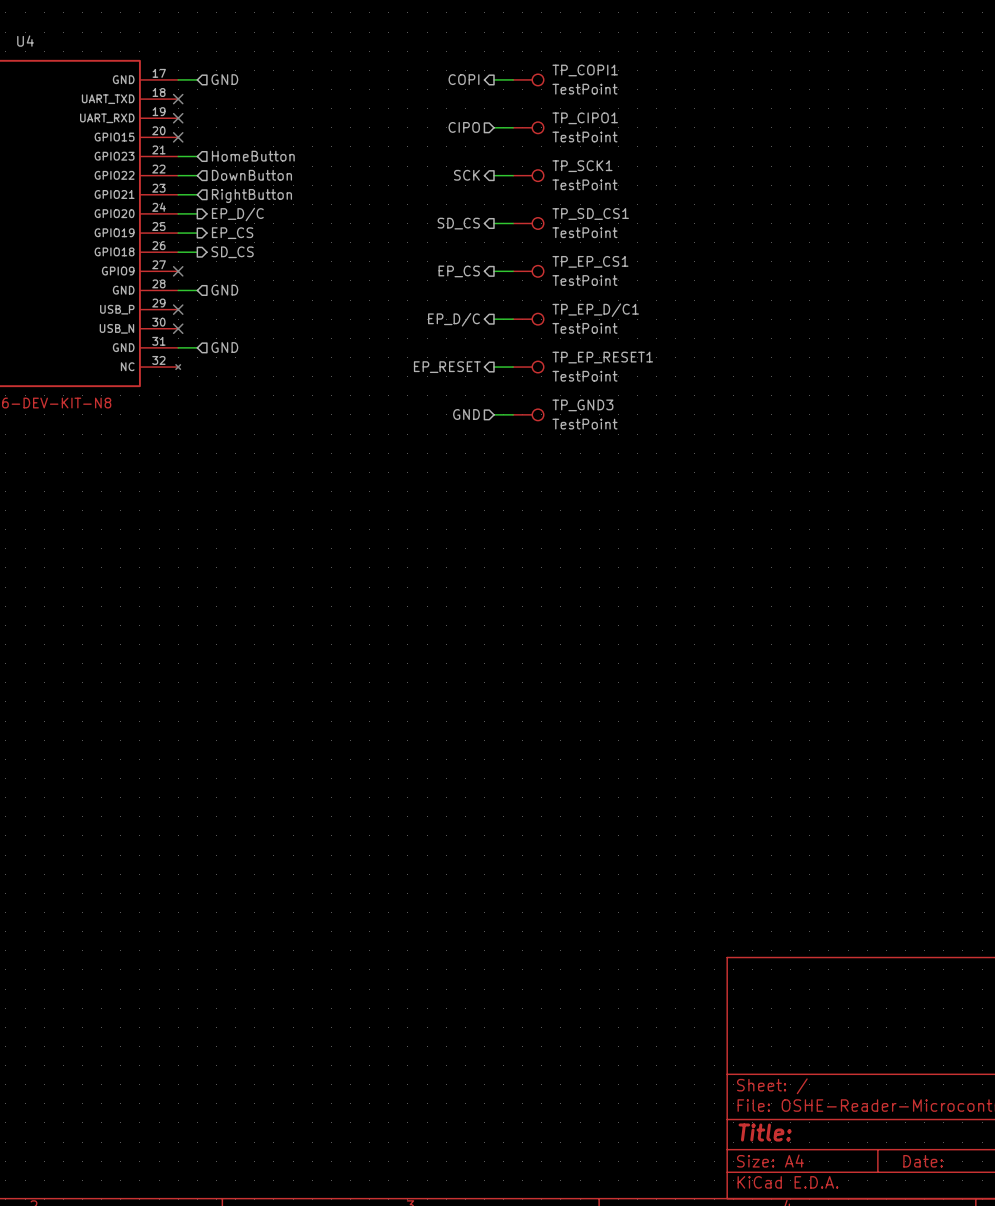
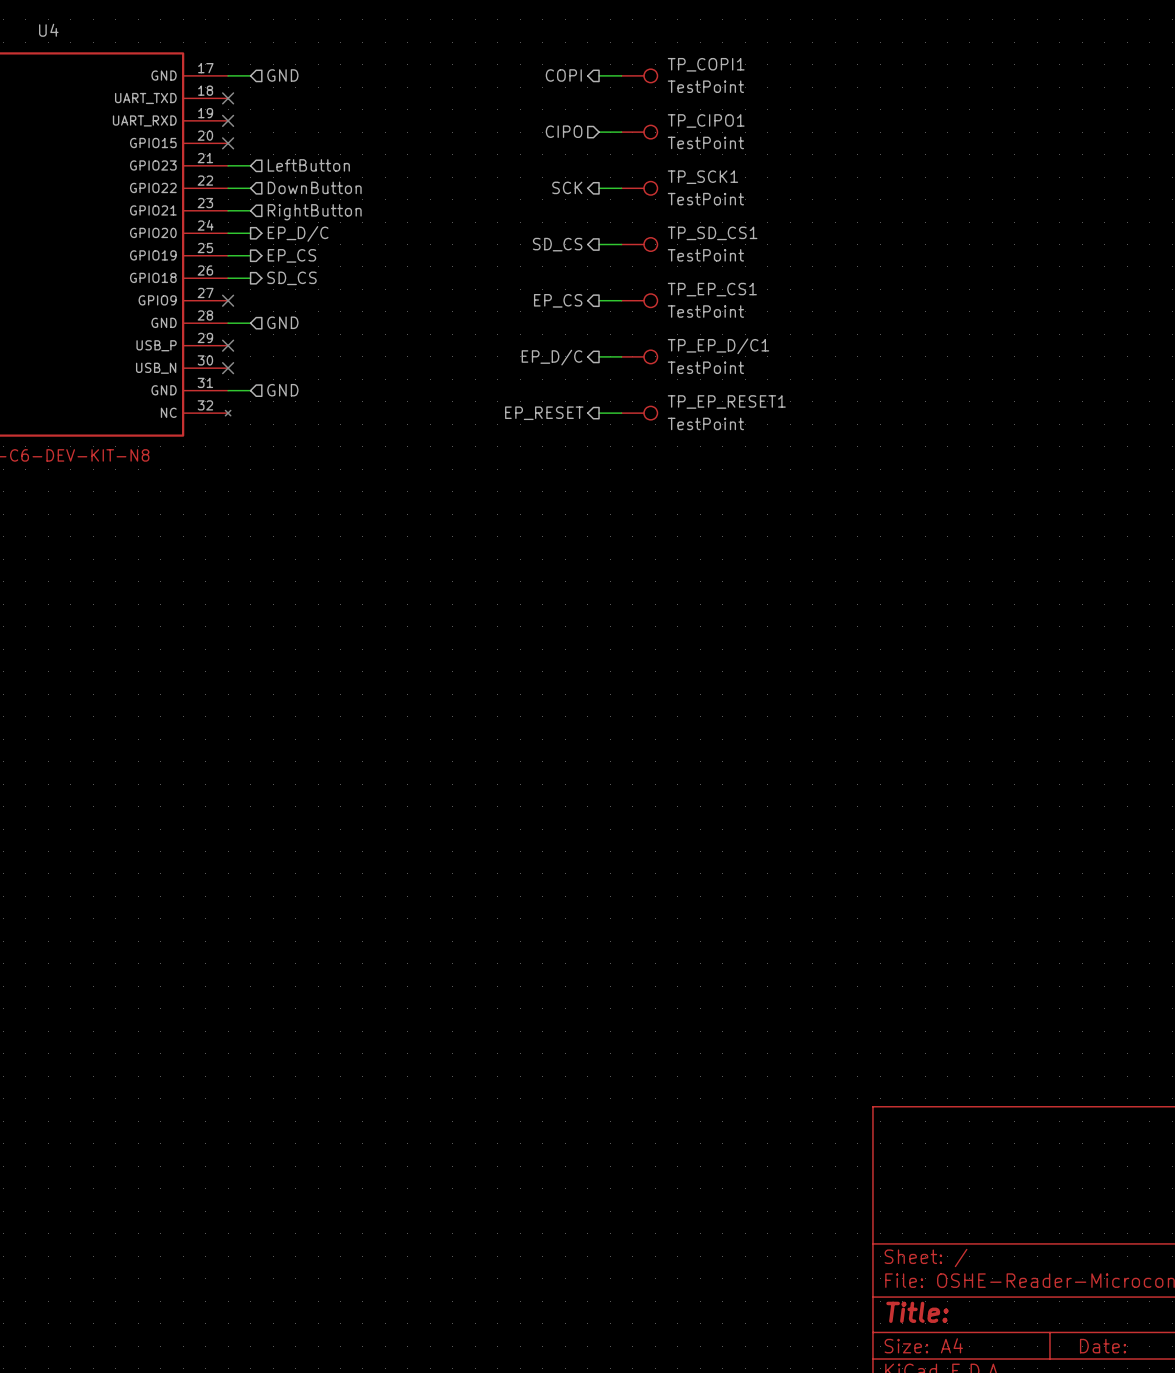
hierarchical label: HomeButton (253, 156) -> LeftButton (308, 165)
hierarchical label: GND (466, 414) -> none
wire: (493, 414) (513, 414) -> none
TP_GND3: TestPoint (528, 414) -> none

